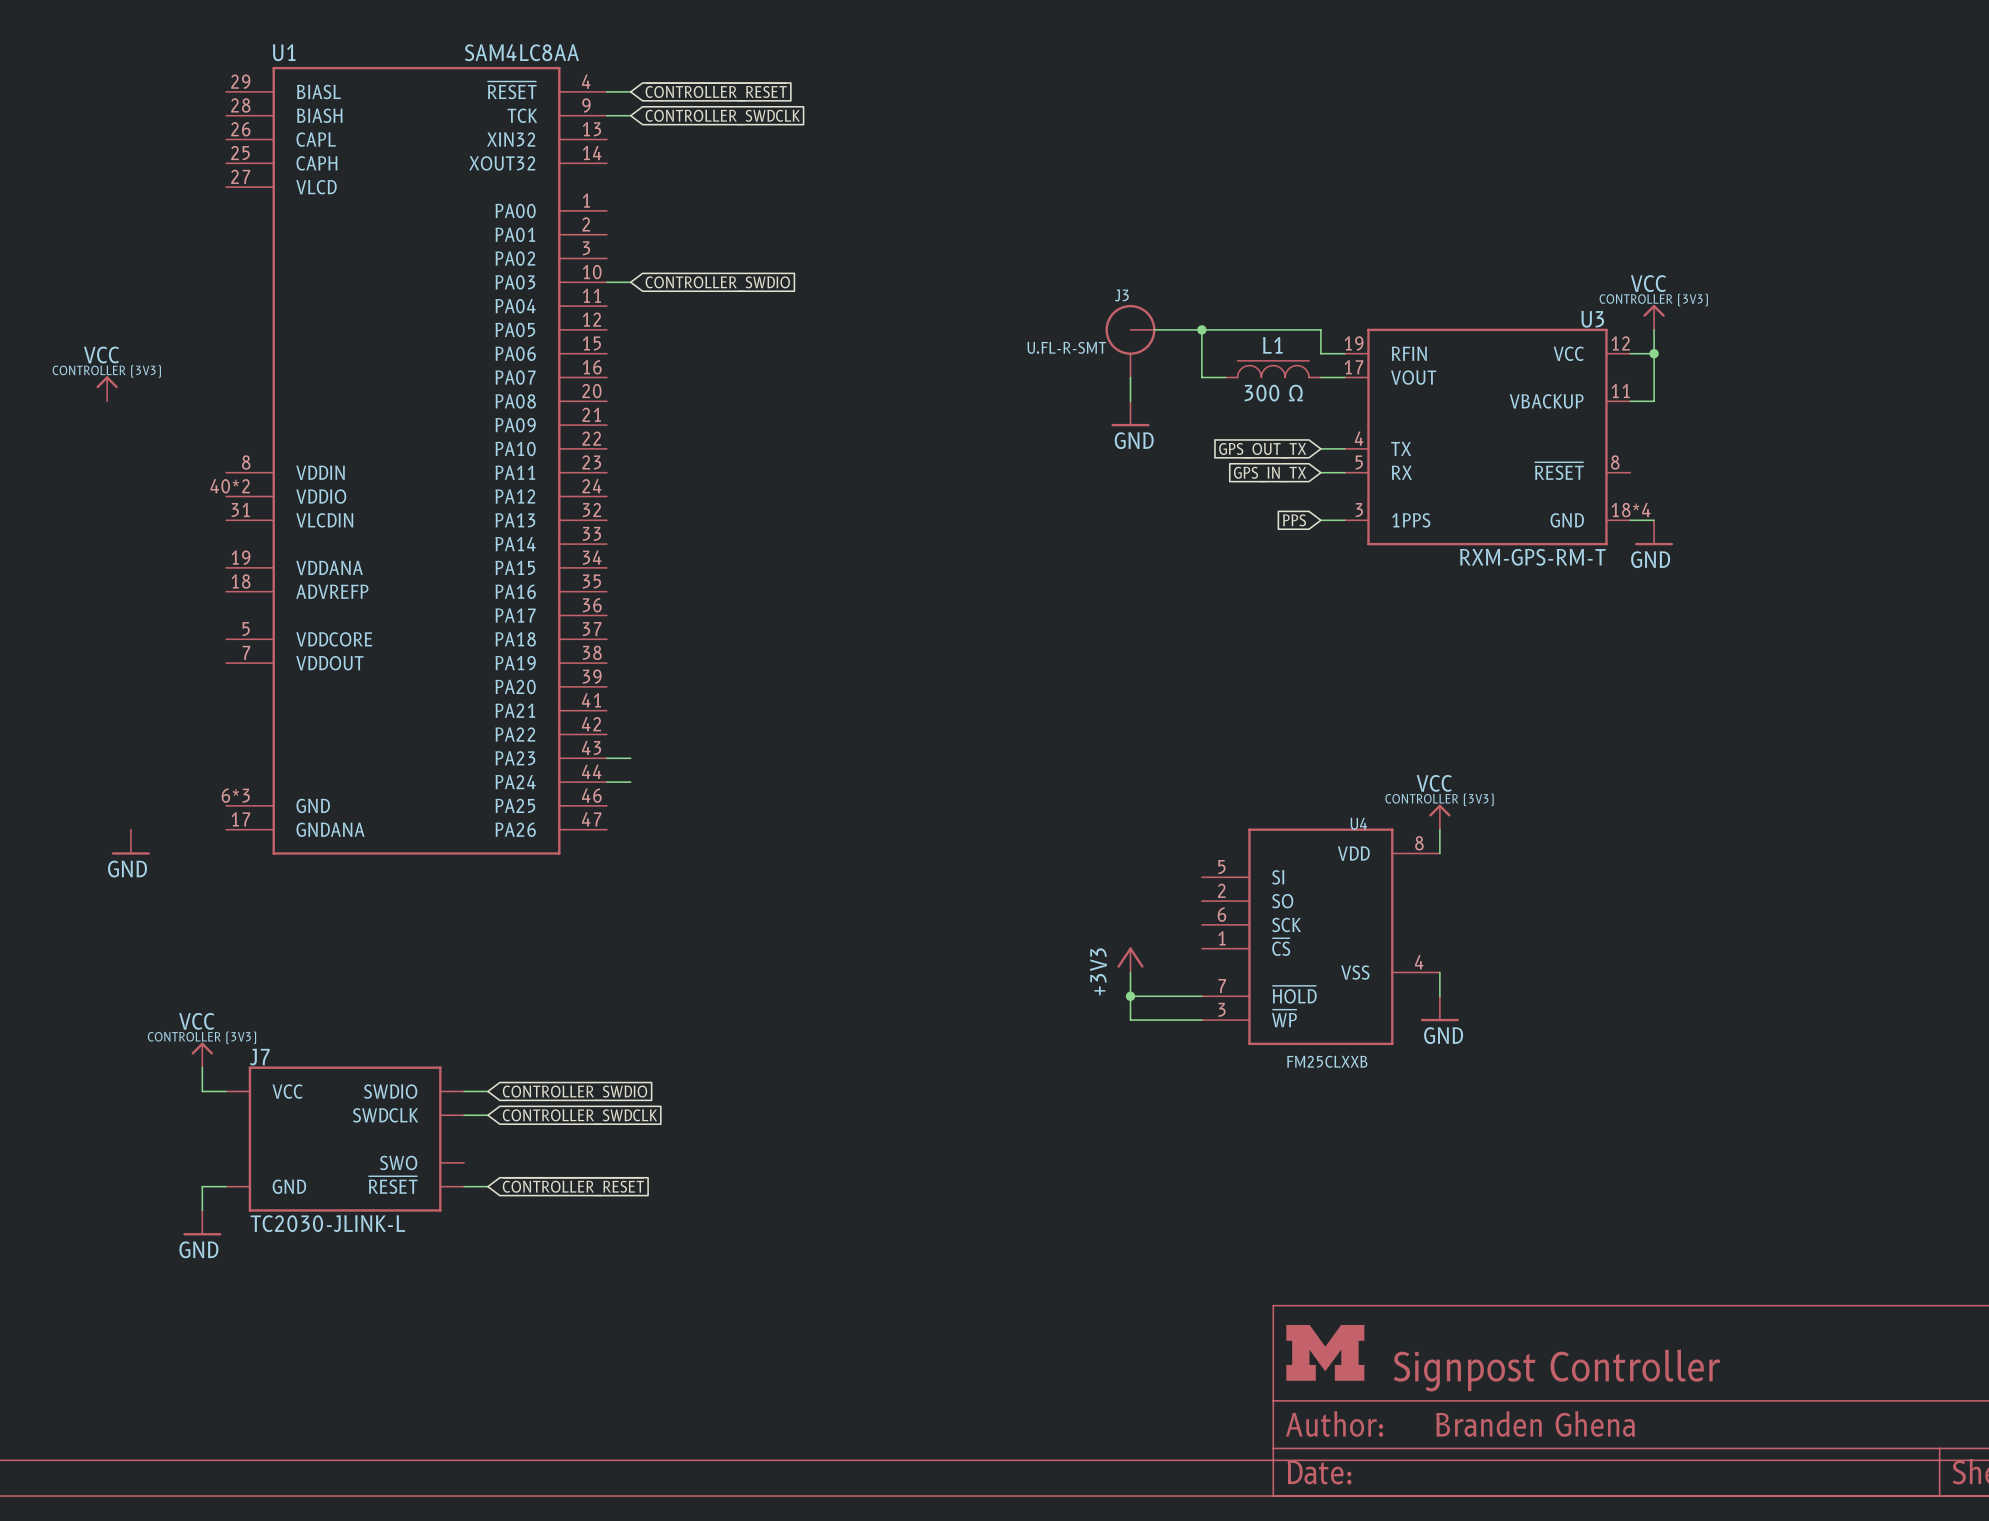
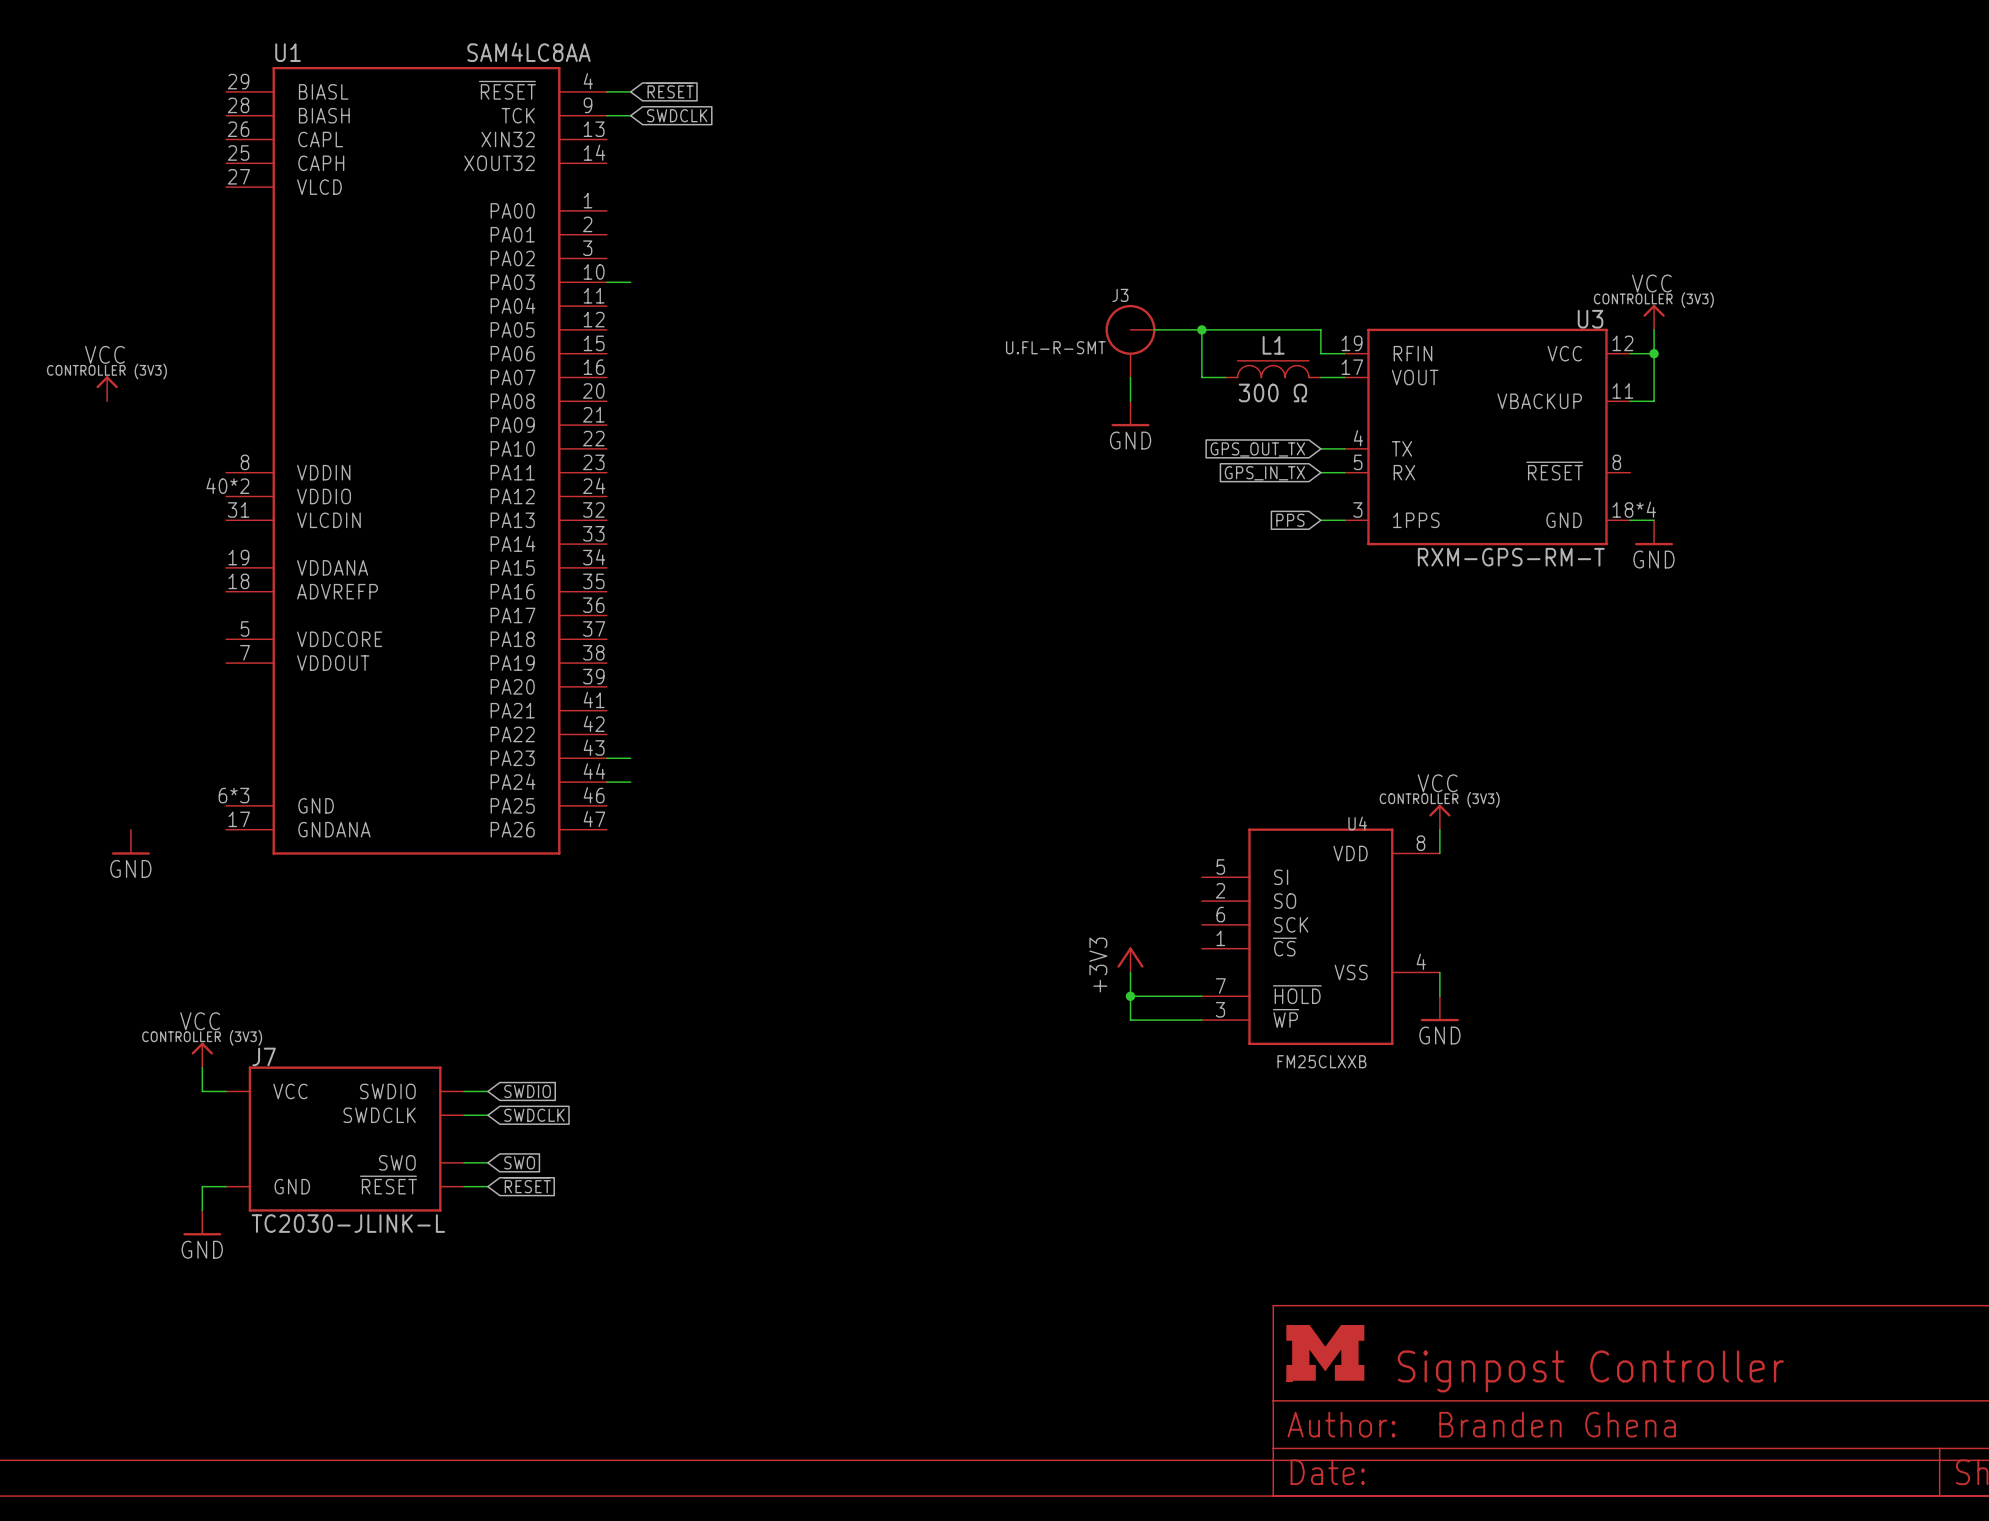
global label: ~{CONTROLLER_RESET} (716, 92) -> ~{RESET} (669, 90)
global label: CONTROLLER_SWDCLK (722, 117) -> SWDCLK (677, 115)
global label: CONTROLLER_SWDIO (717, 284) -> none
global label: CONTROLLER_SWDIO (575, 1093) -> SWDIO (527, 1091)
global label: CONTROLLER_SWDCLK (579, 1117) -> SWDCLK (534, 1115)
wire: none -> (464, 1162) (487, 1162)
global label: none -> SWO (519, 1162)
global label: ~{CONTROLLER_RESET} (573, 1187) -> ~{RESET} (527, 1185)

